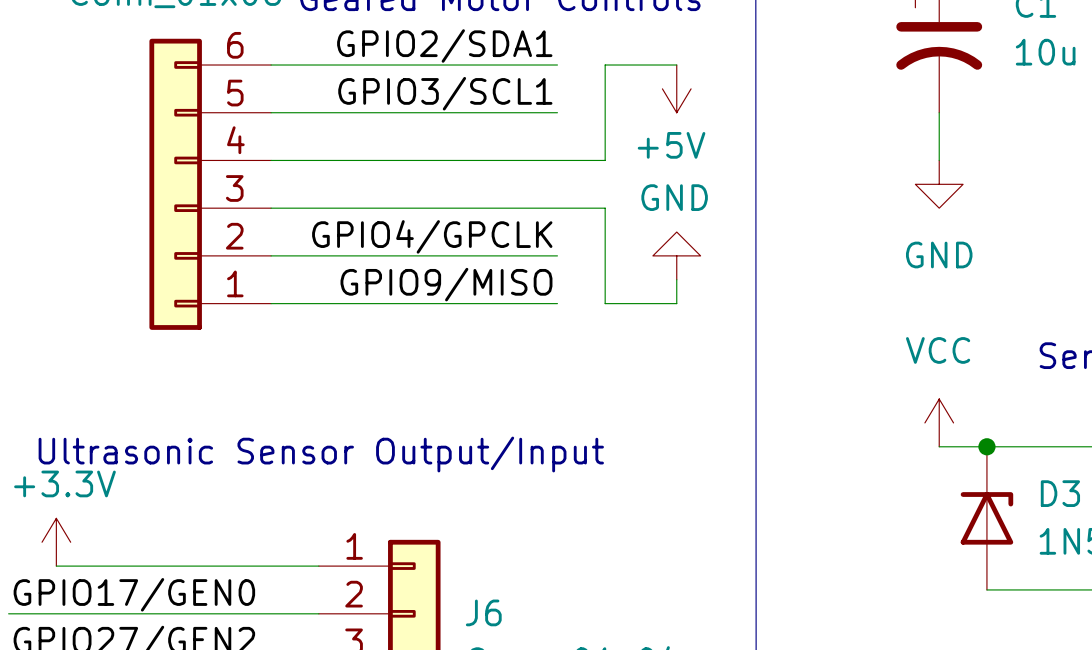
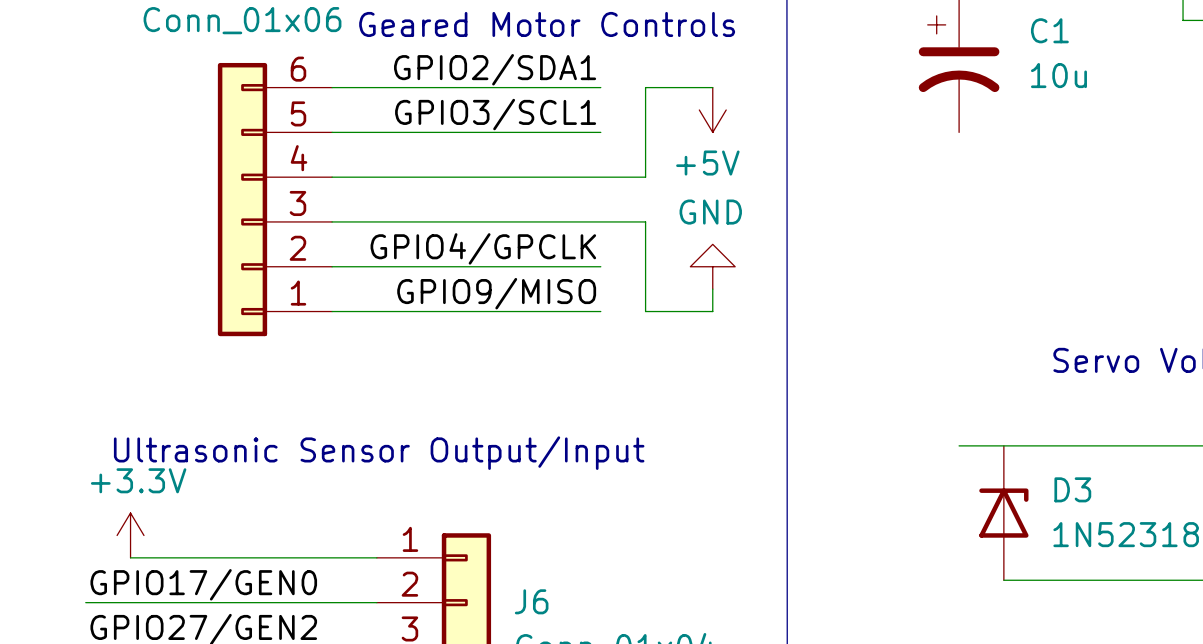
wire: (939, 112) (939, 160) -> none
power symbol: GND (939, 184) -> none
power symbol: VCC (939, 422) -> none
junction: (986, 446) -> none

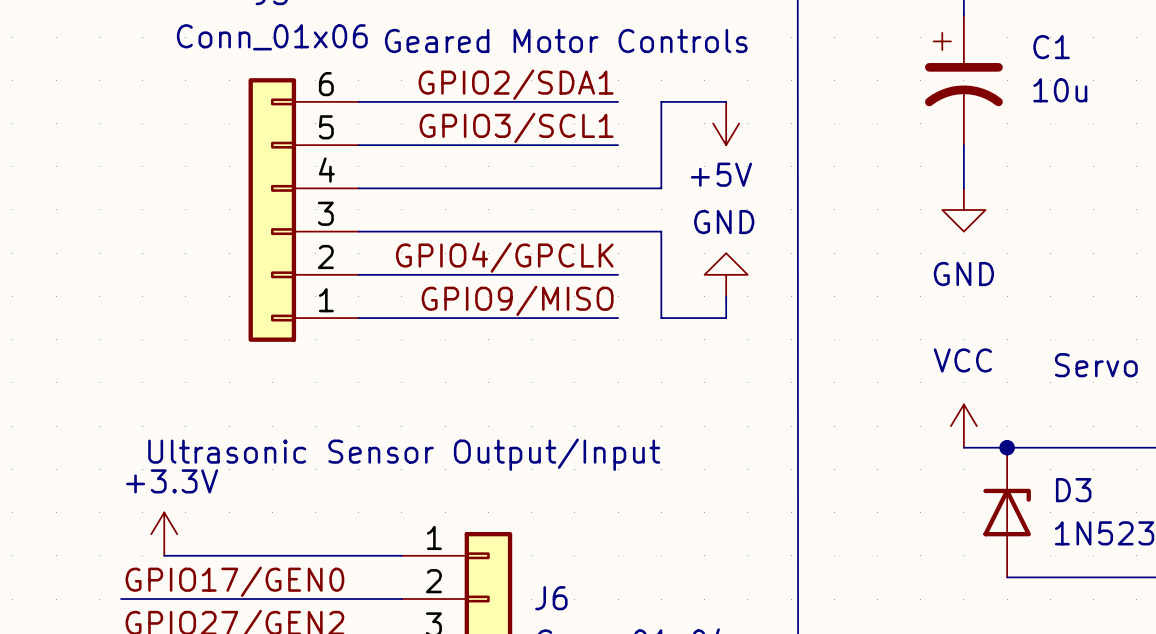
wire: none -> (963, 145) (963, 188)
power symbol: none -> GND (963, 209)
power symbol: none -> VCC (963, 426)
junction: none -> (1007, 447)

